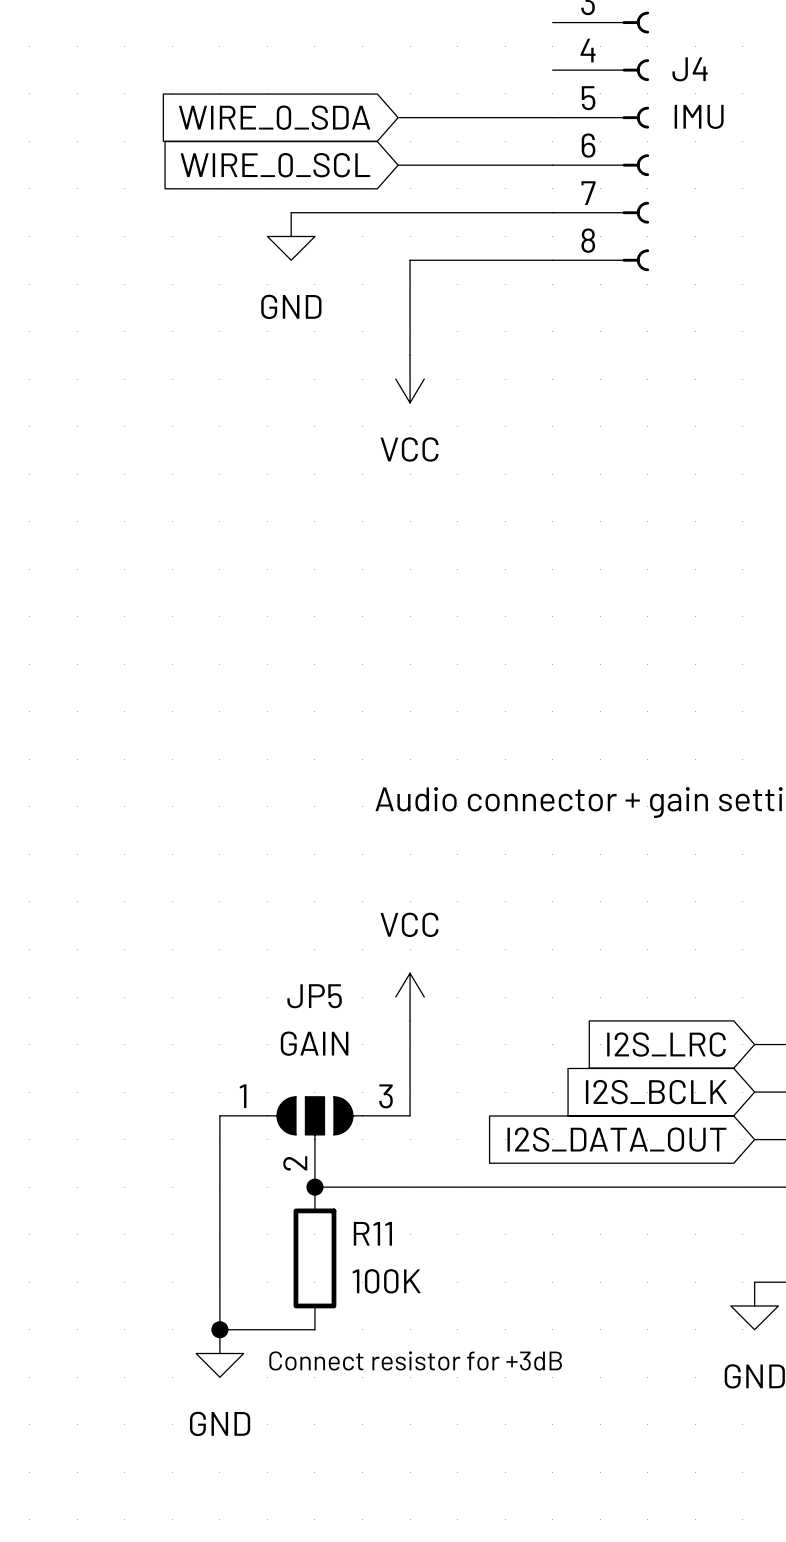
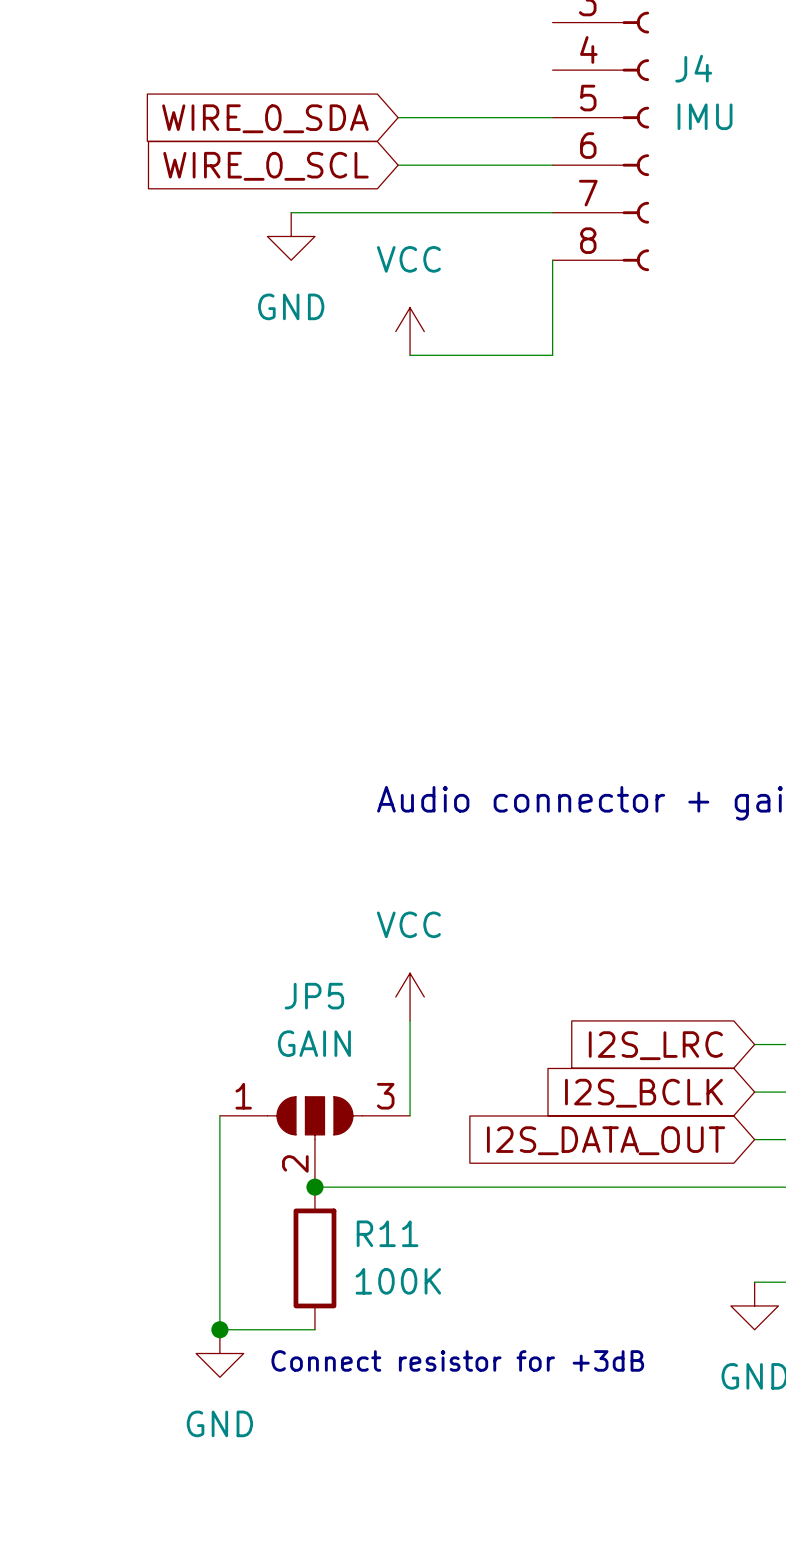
wire: (552, 260) (410, 260) (410, 355) -> (552, 260) (552, 355) (410, 355)
power symbol rotation: 0° (410, 379) -> 180° (410, 331)
power symbol position: VCC (410, 379) -> VCC (410, 331)

